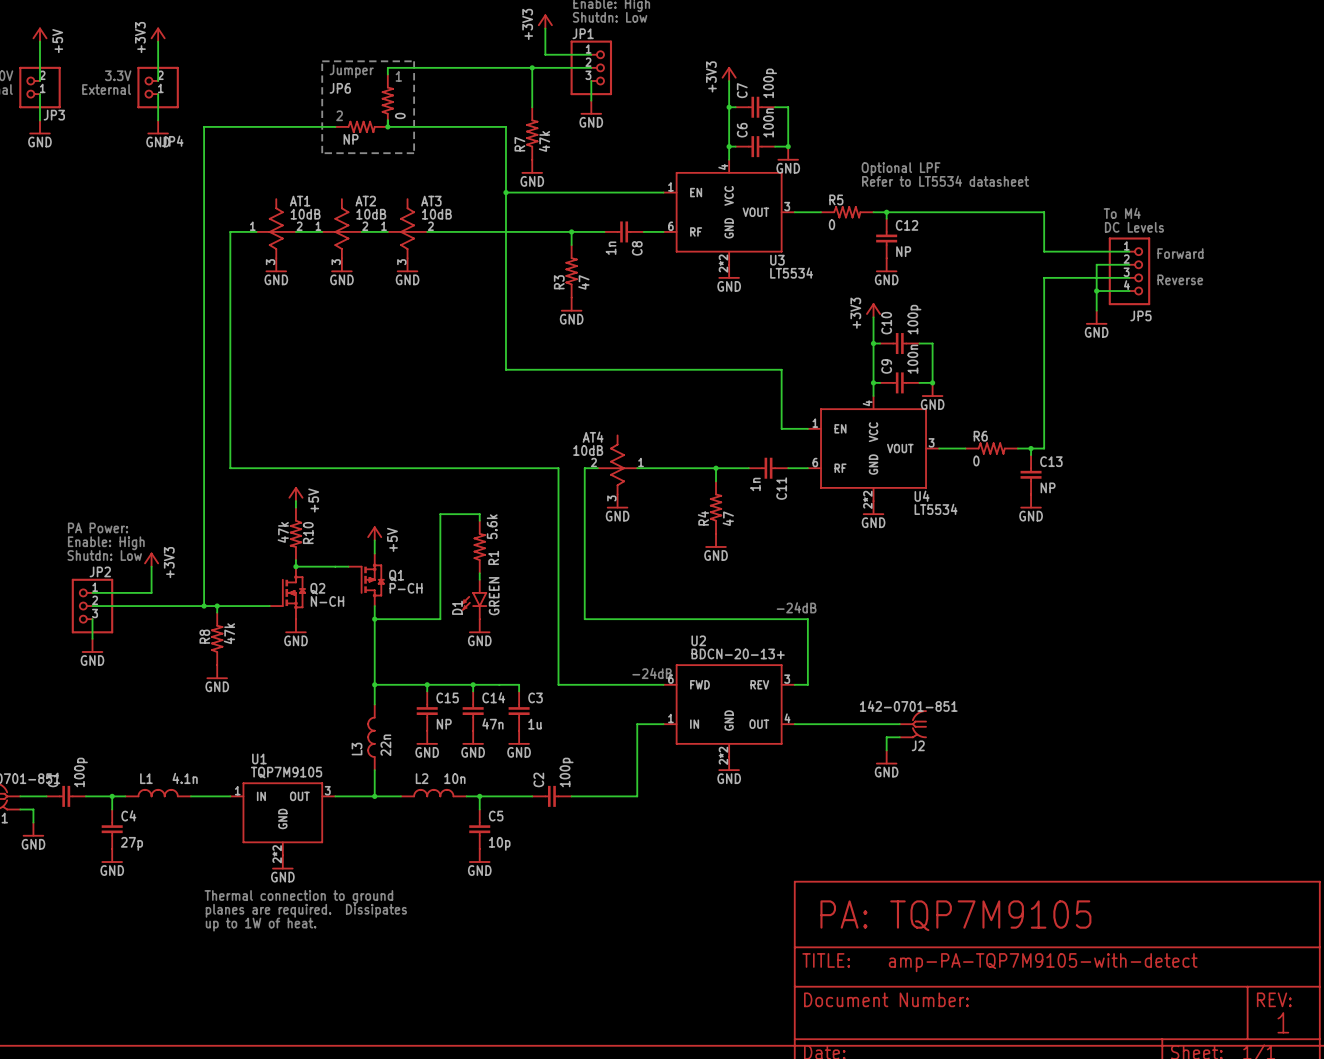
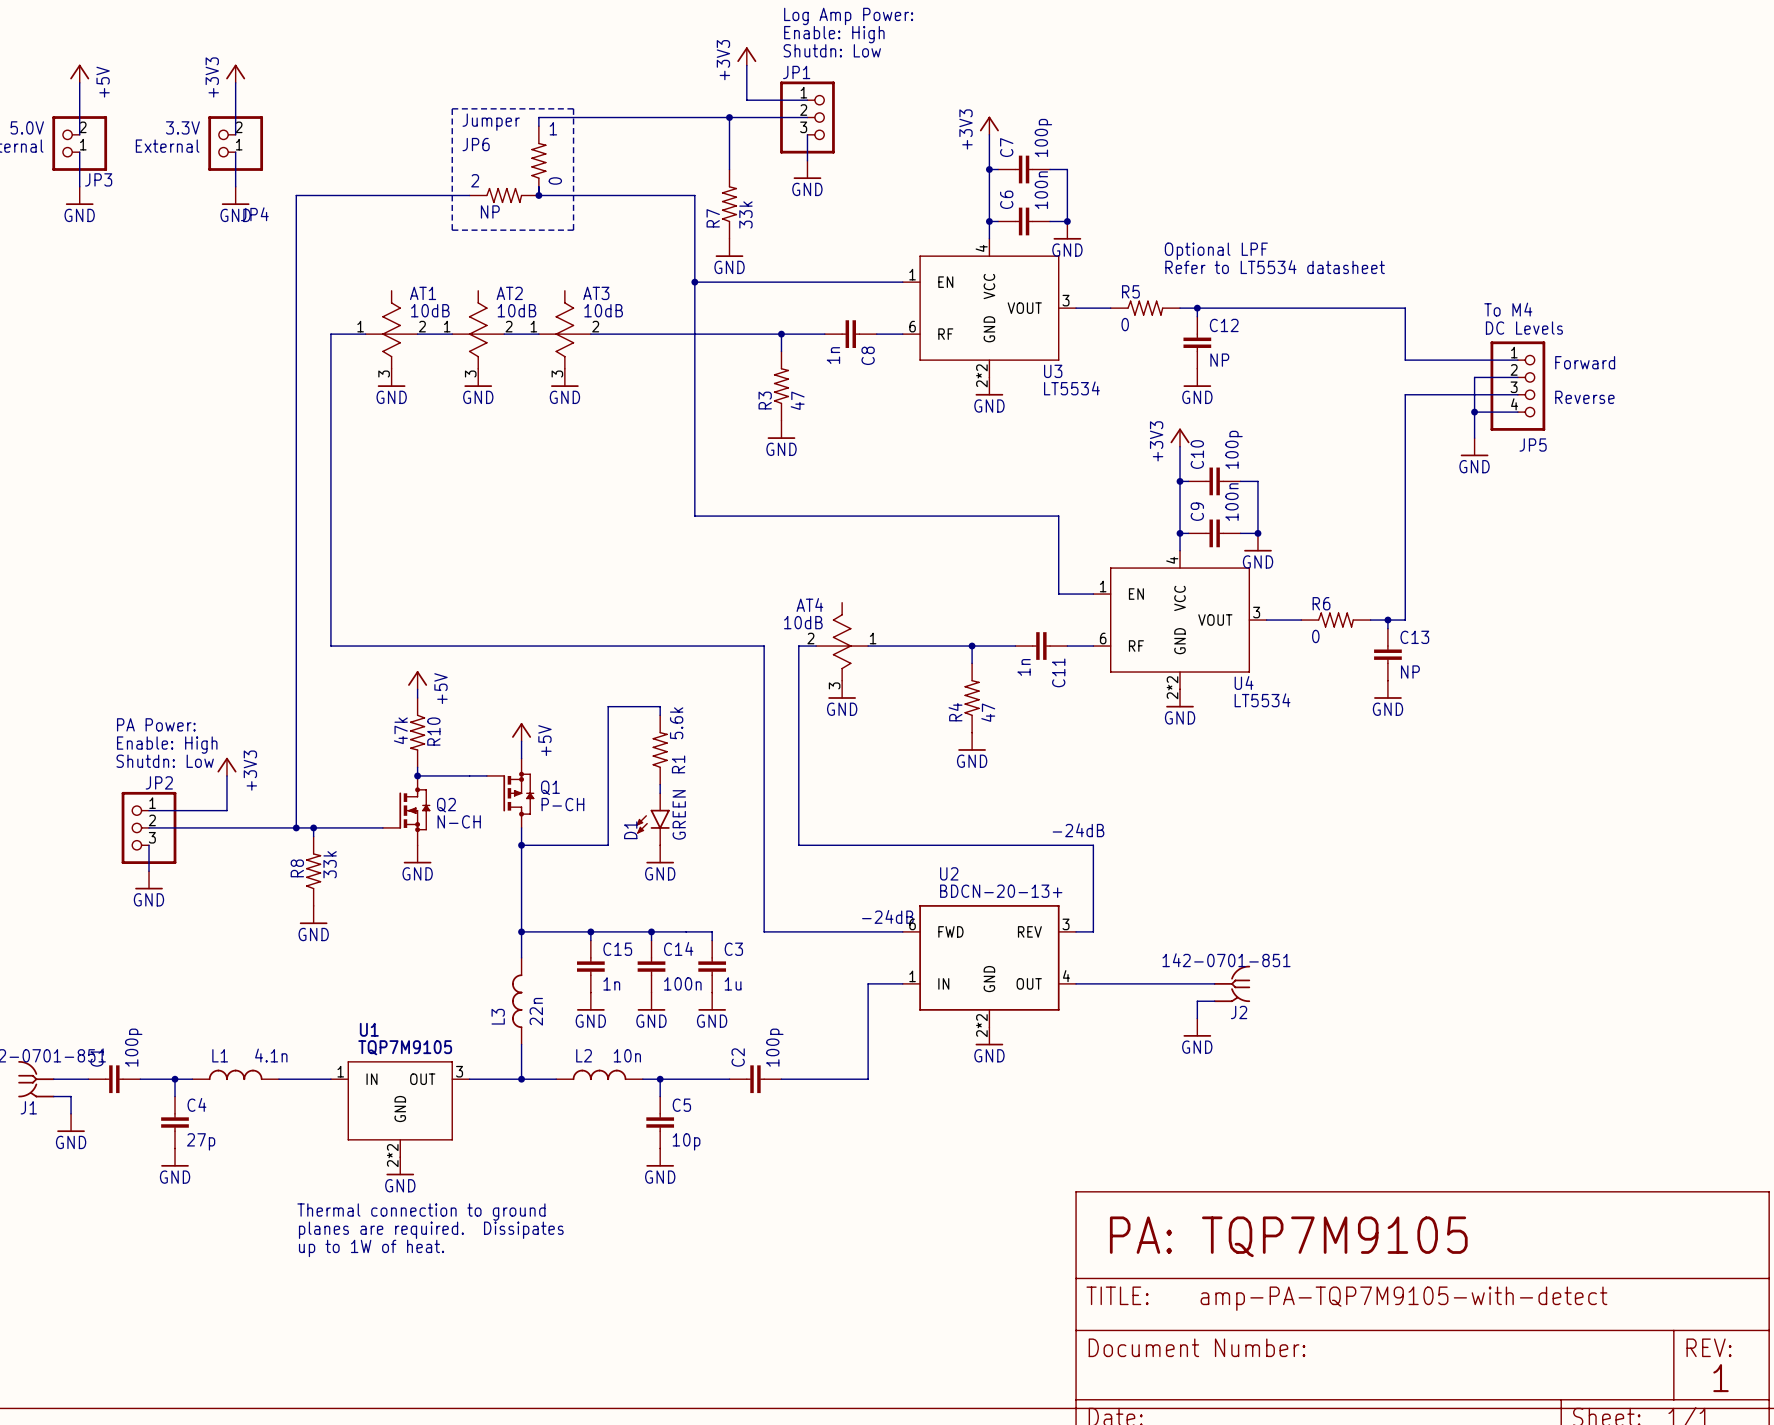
R7 value: 47k (544, 141) -> 33k (745, 214)
R8 value: 47k (229, 633) -> 33k (330, 864)
C14 value: 47n (492, 723) -> 100n (682, 983)
C15 value: NP (444, 724) -> 1n (611, 983)

